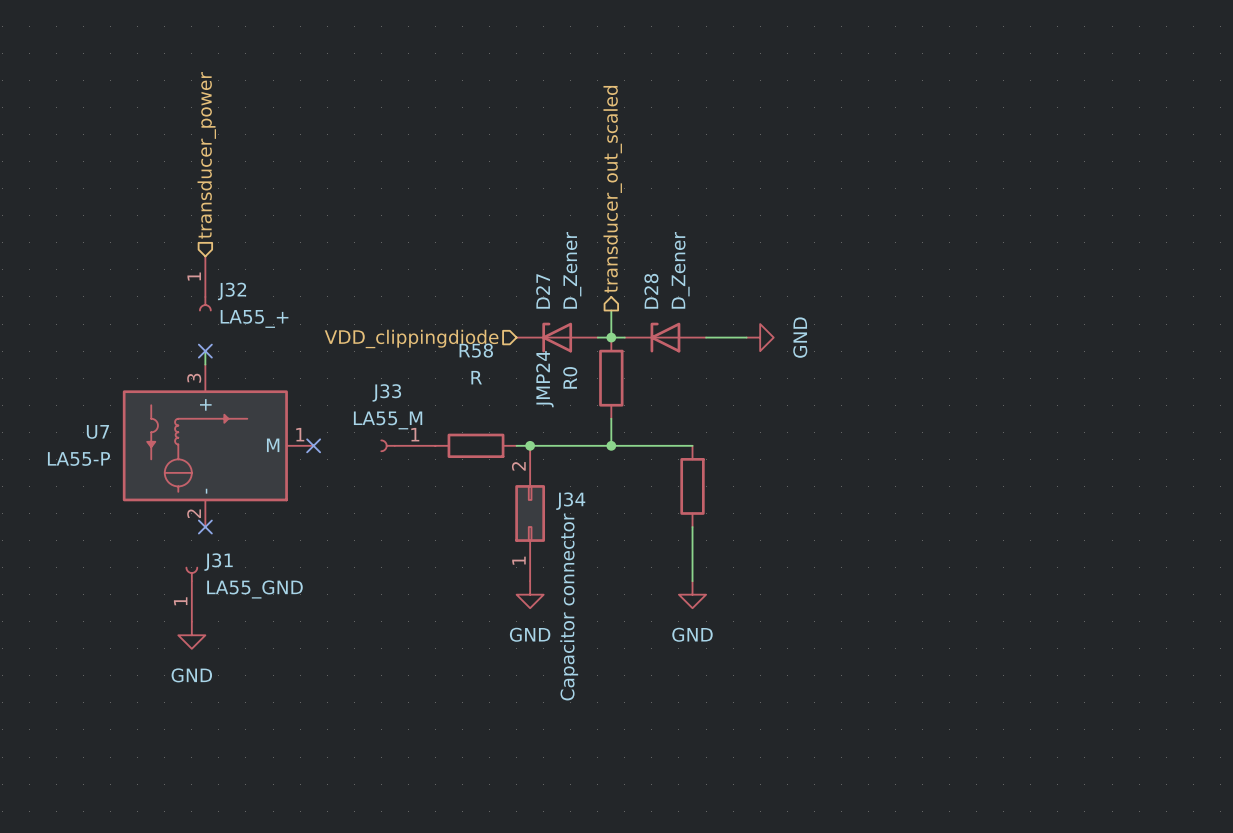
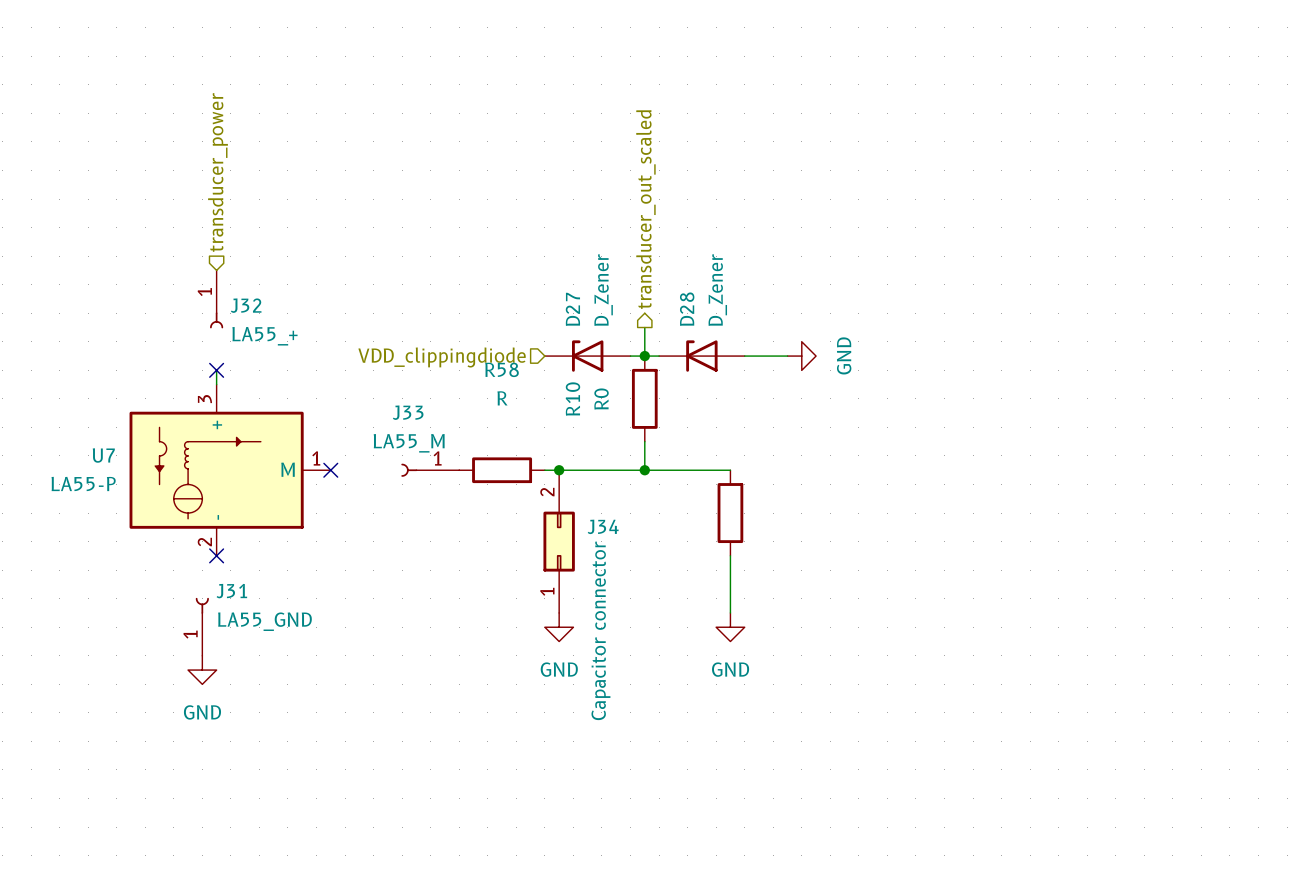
JMP24 name: JMP24 (544, 379) -> R10 (572, 399)

